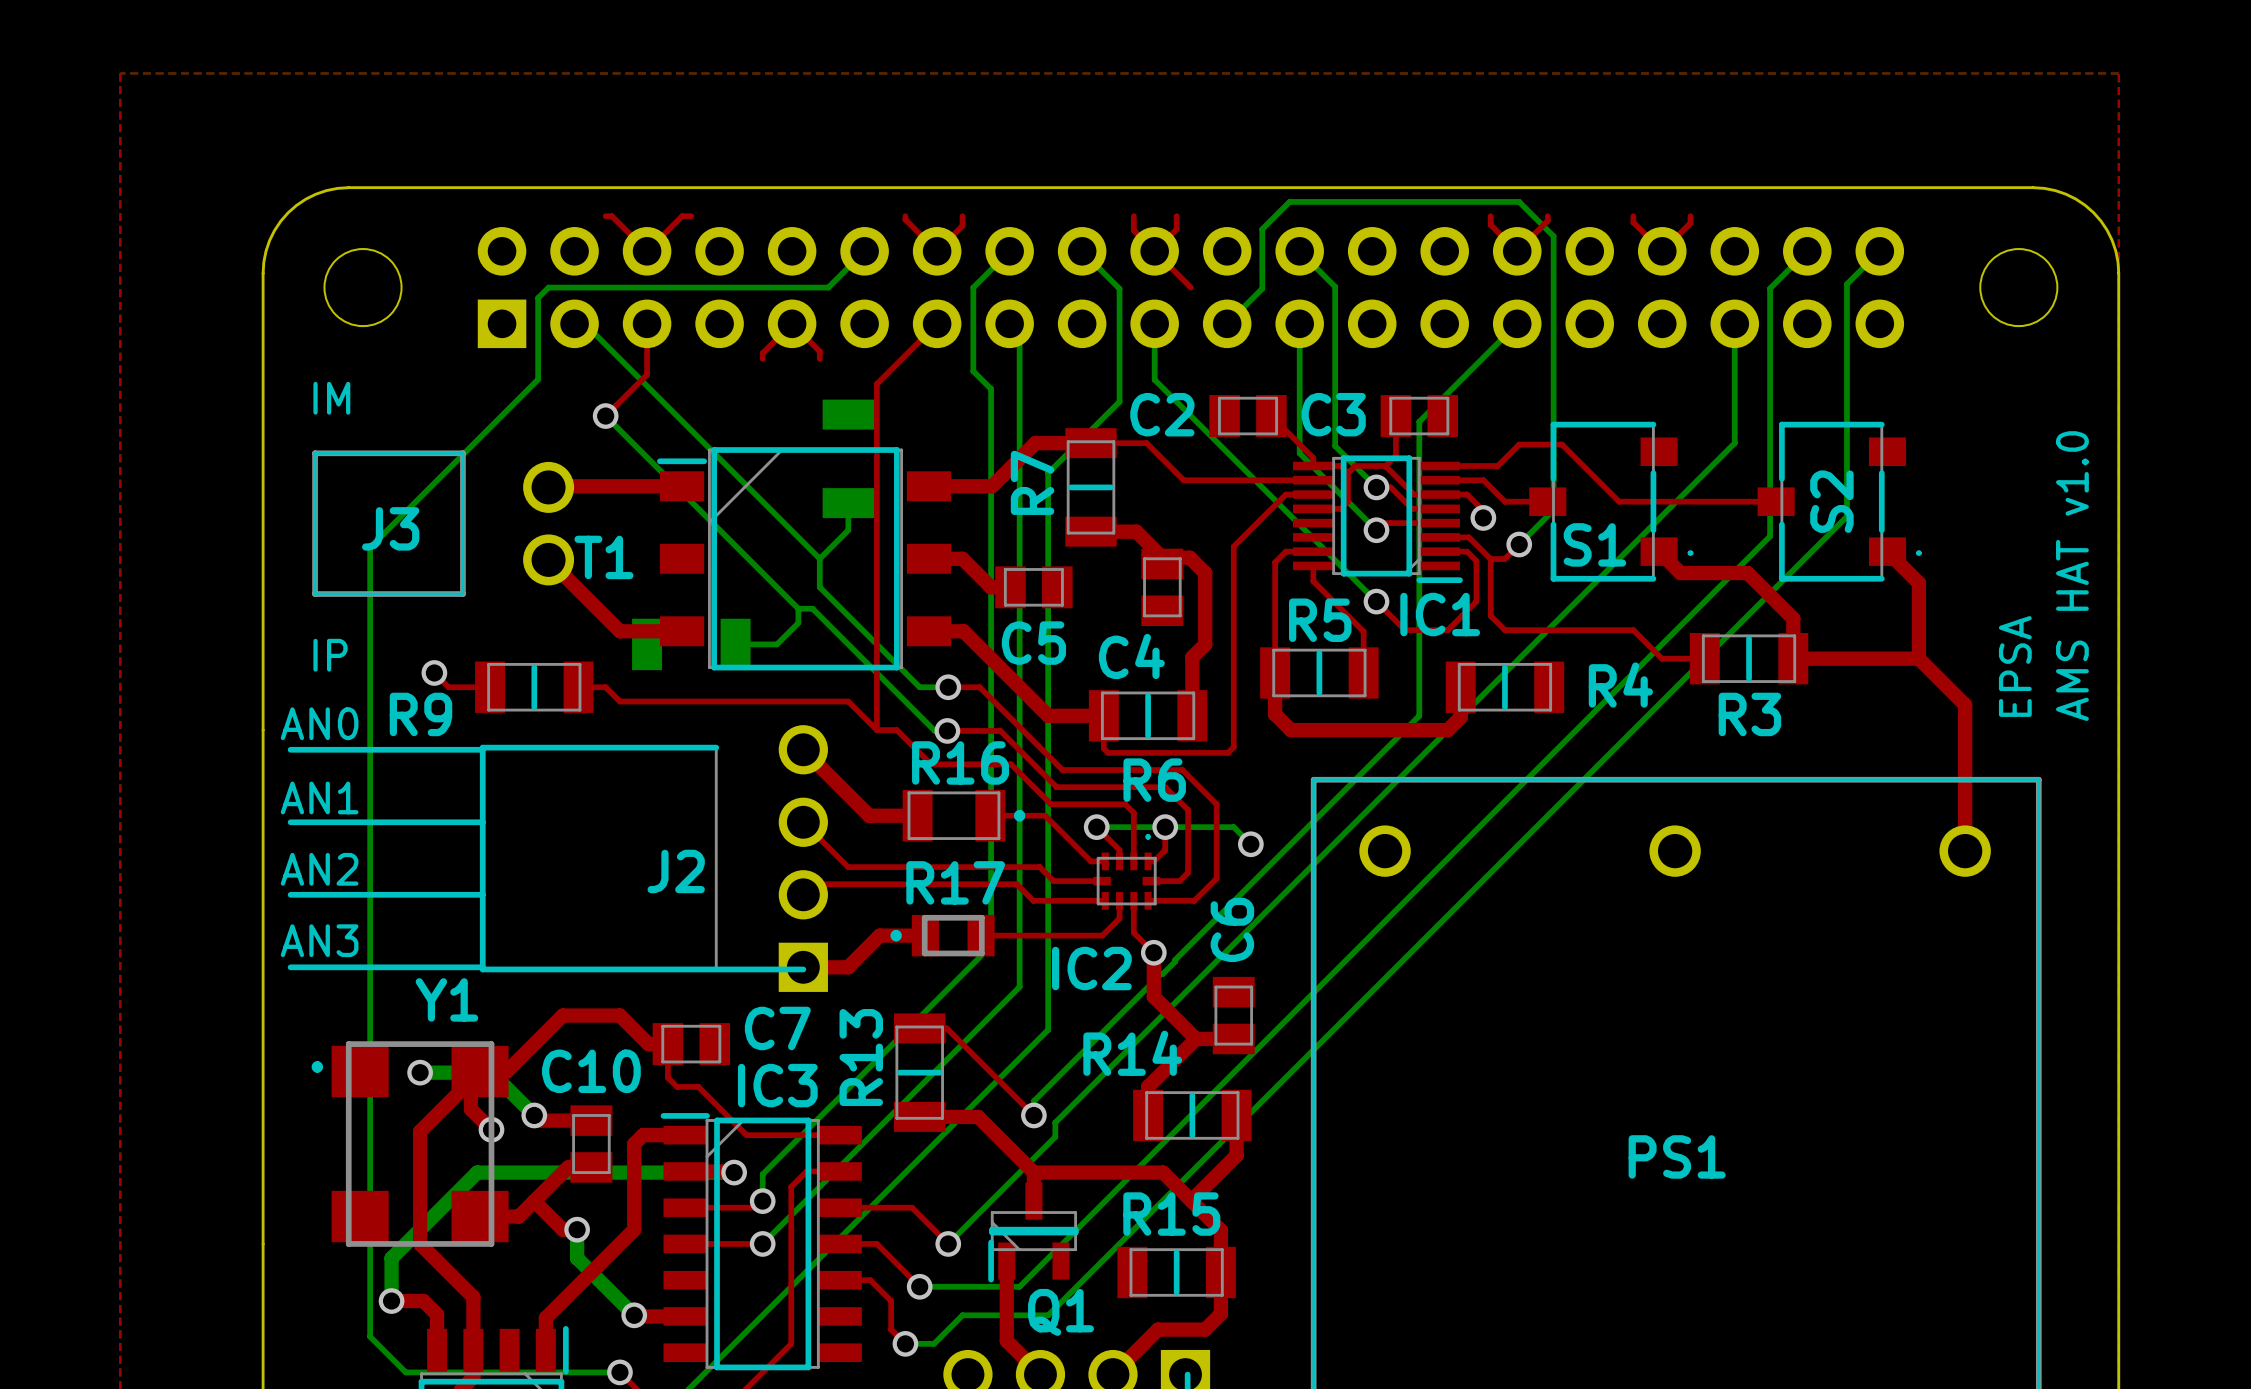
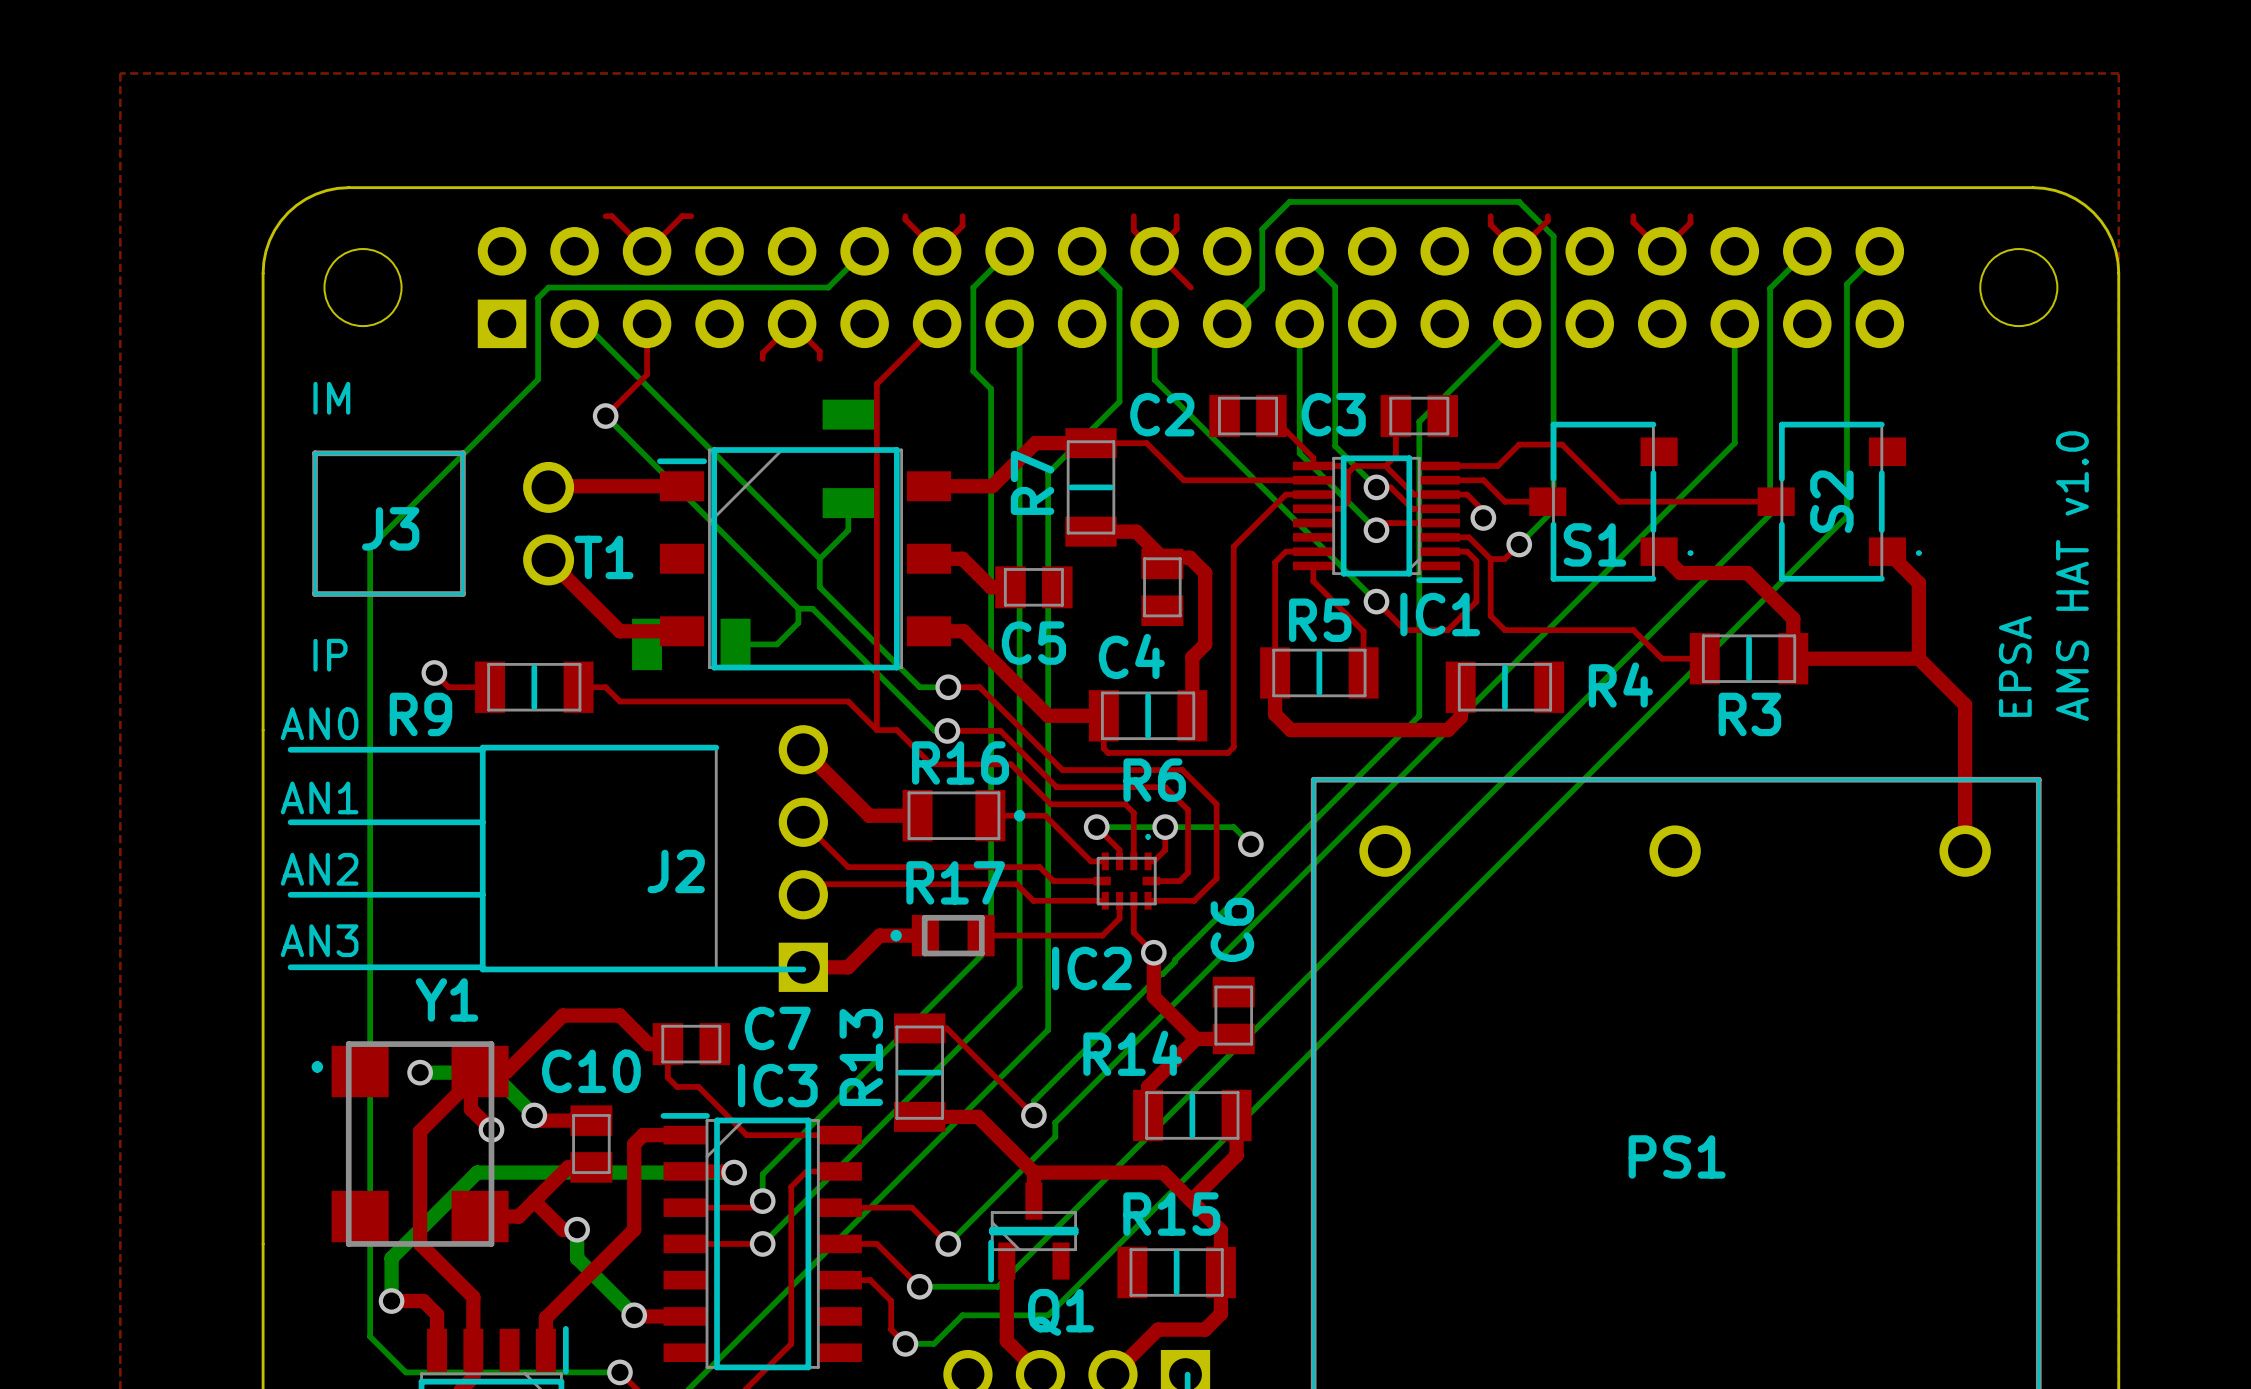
bottom track: (1770, 514) (1770, 536) (1019, 1286) (997, 1286) -> (1770, 514) (997, 1286)

